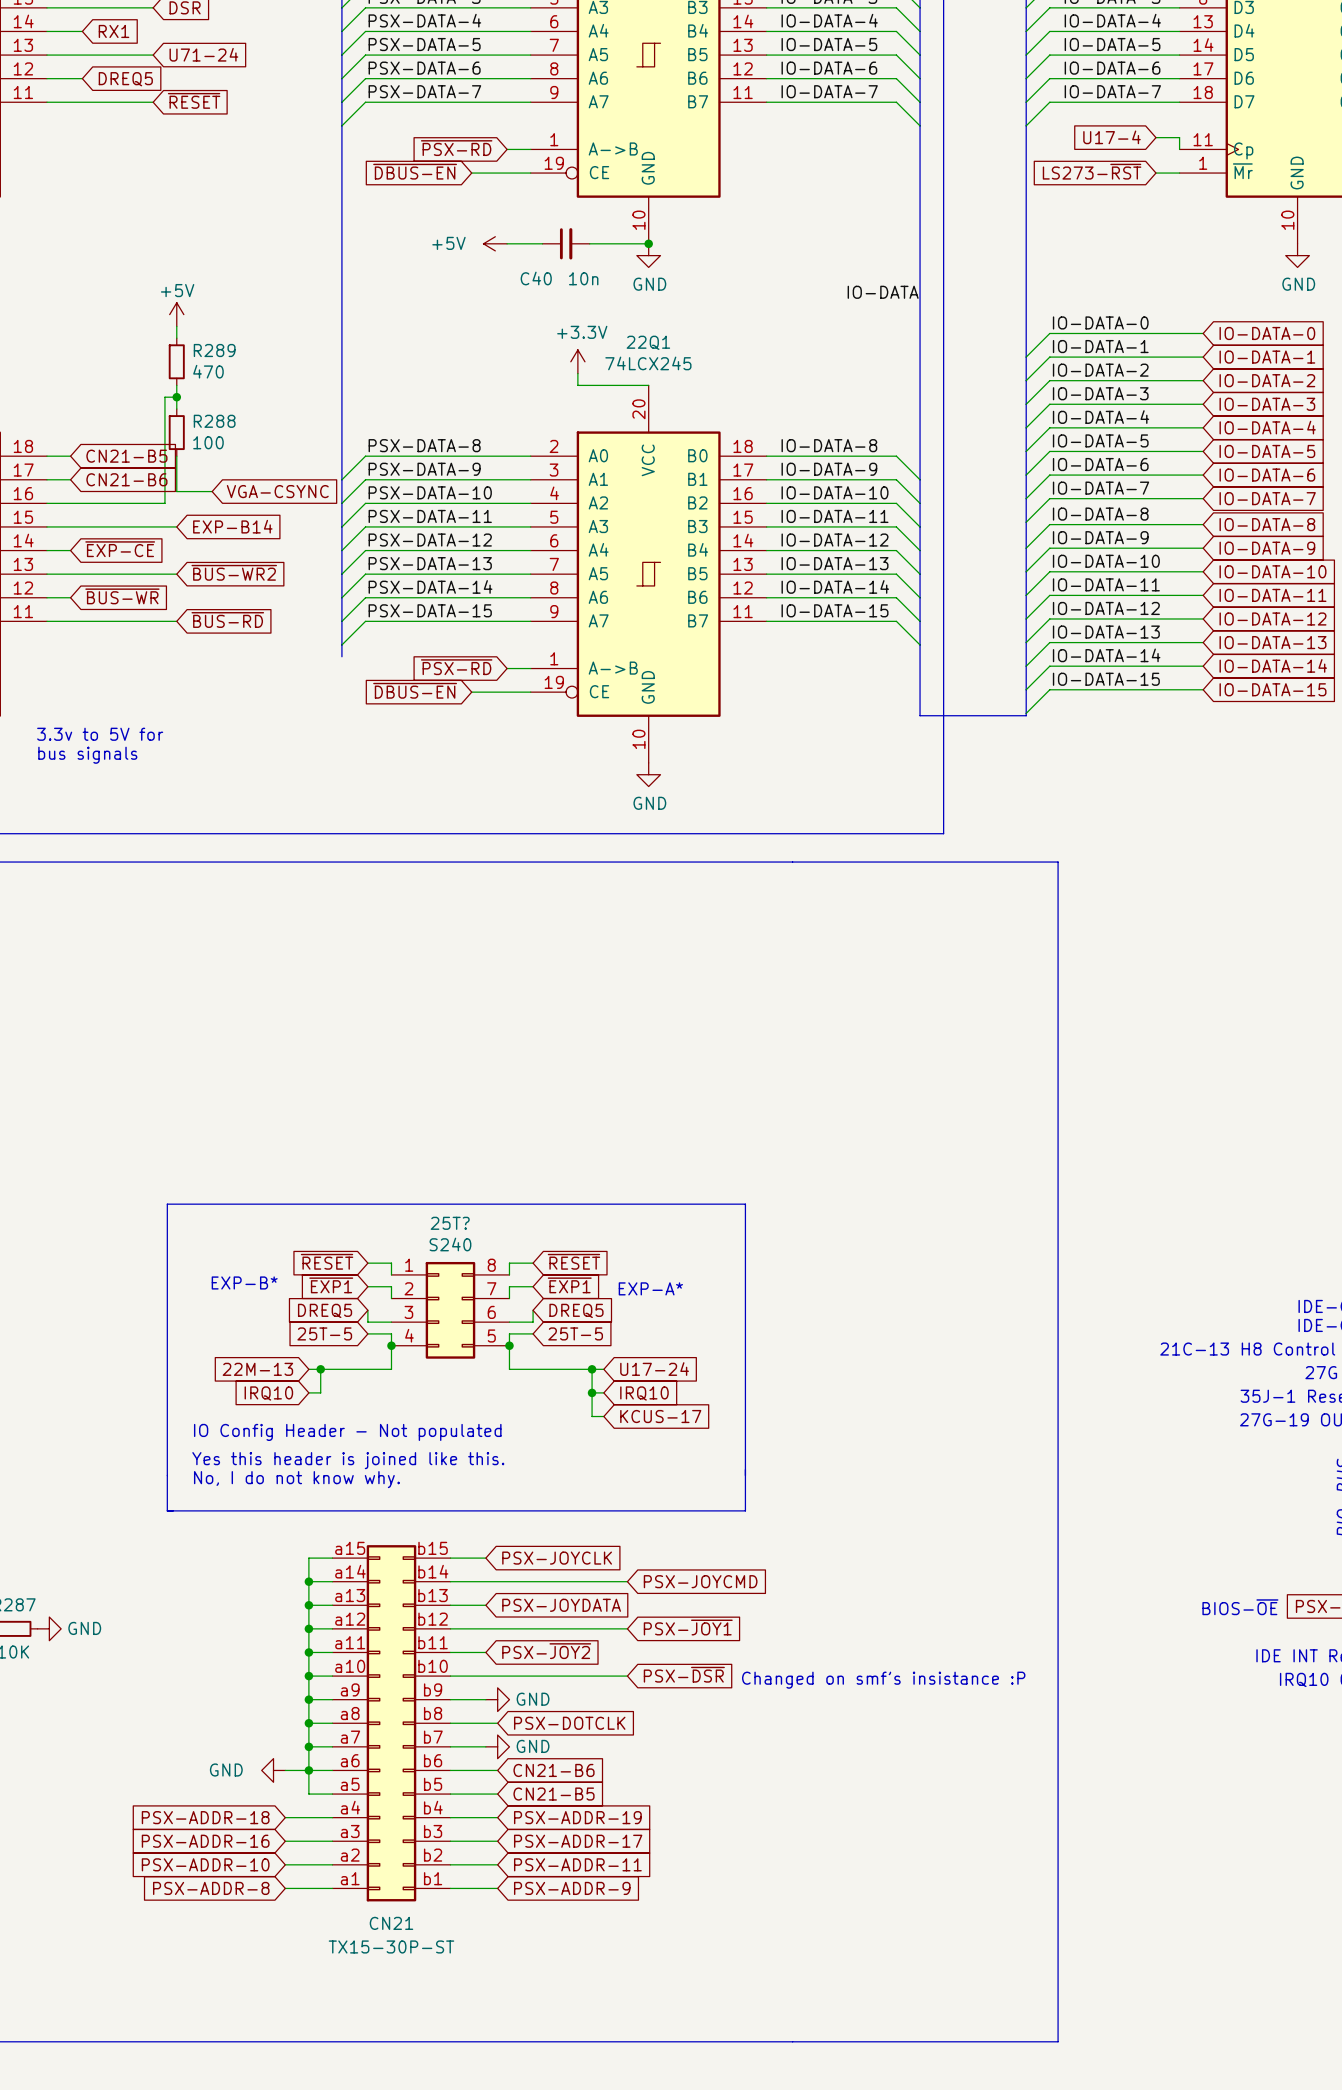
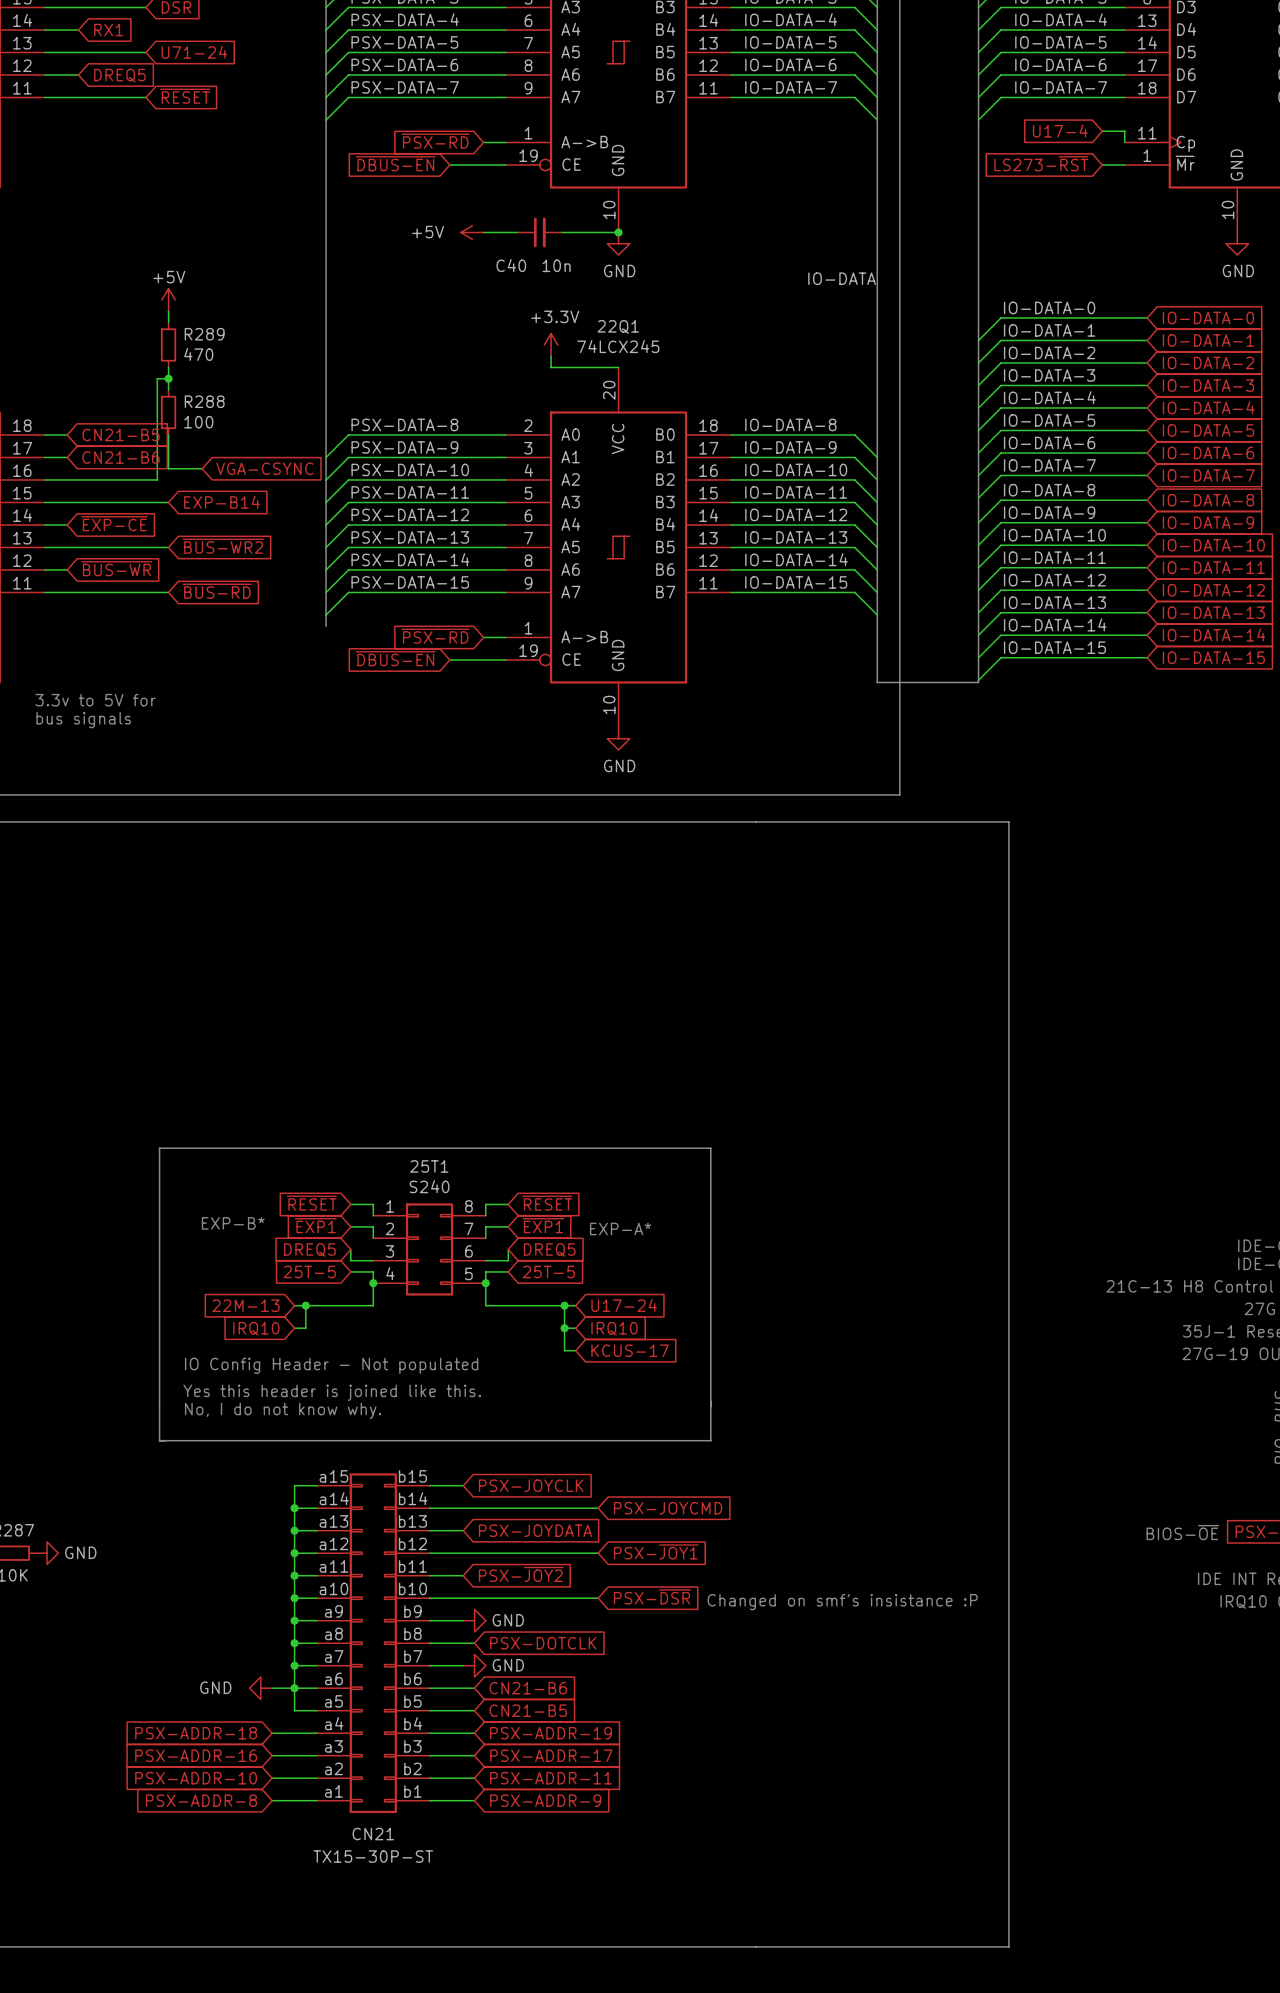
25T? name: 25T? (450, 1223) -> 25T1 (429, 1166)

